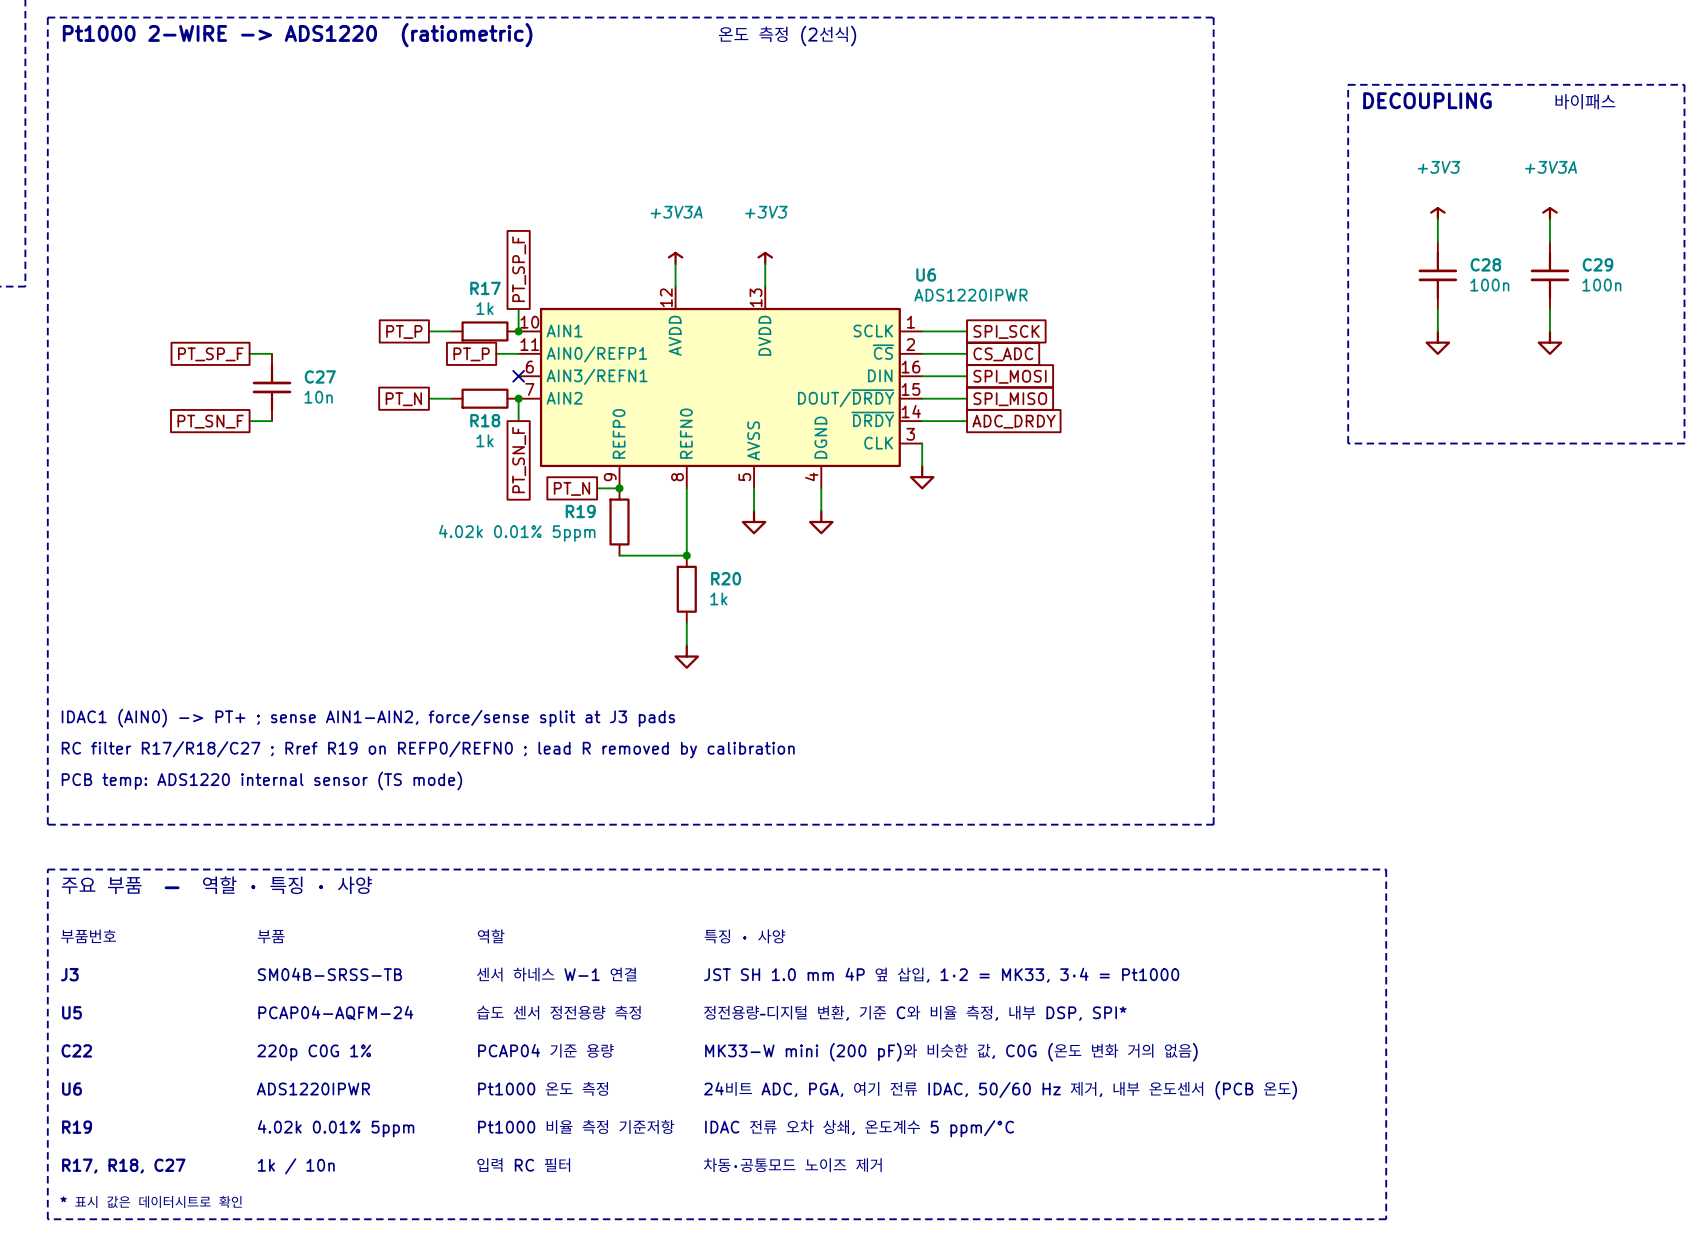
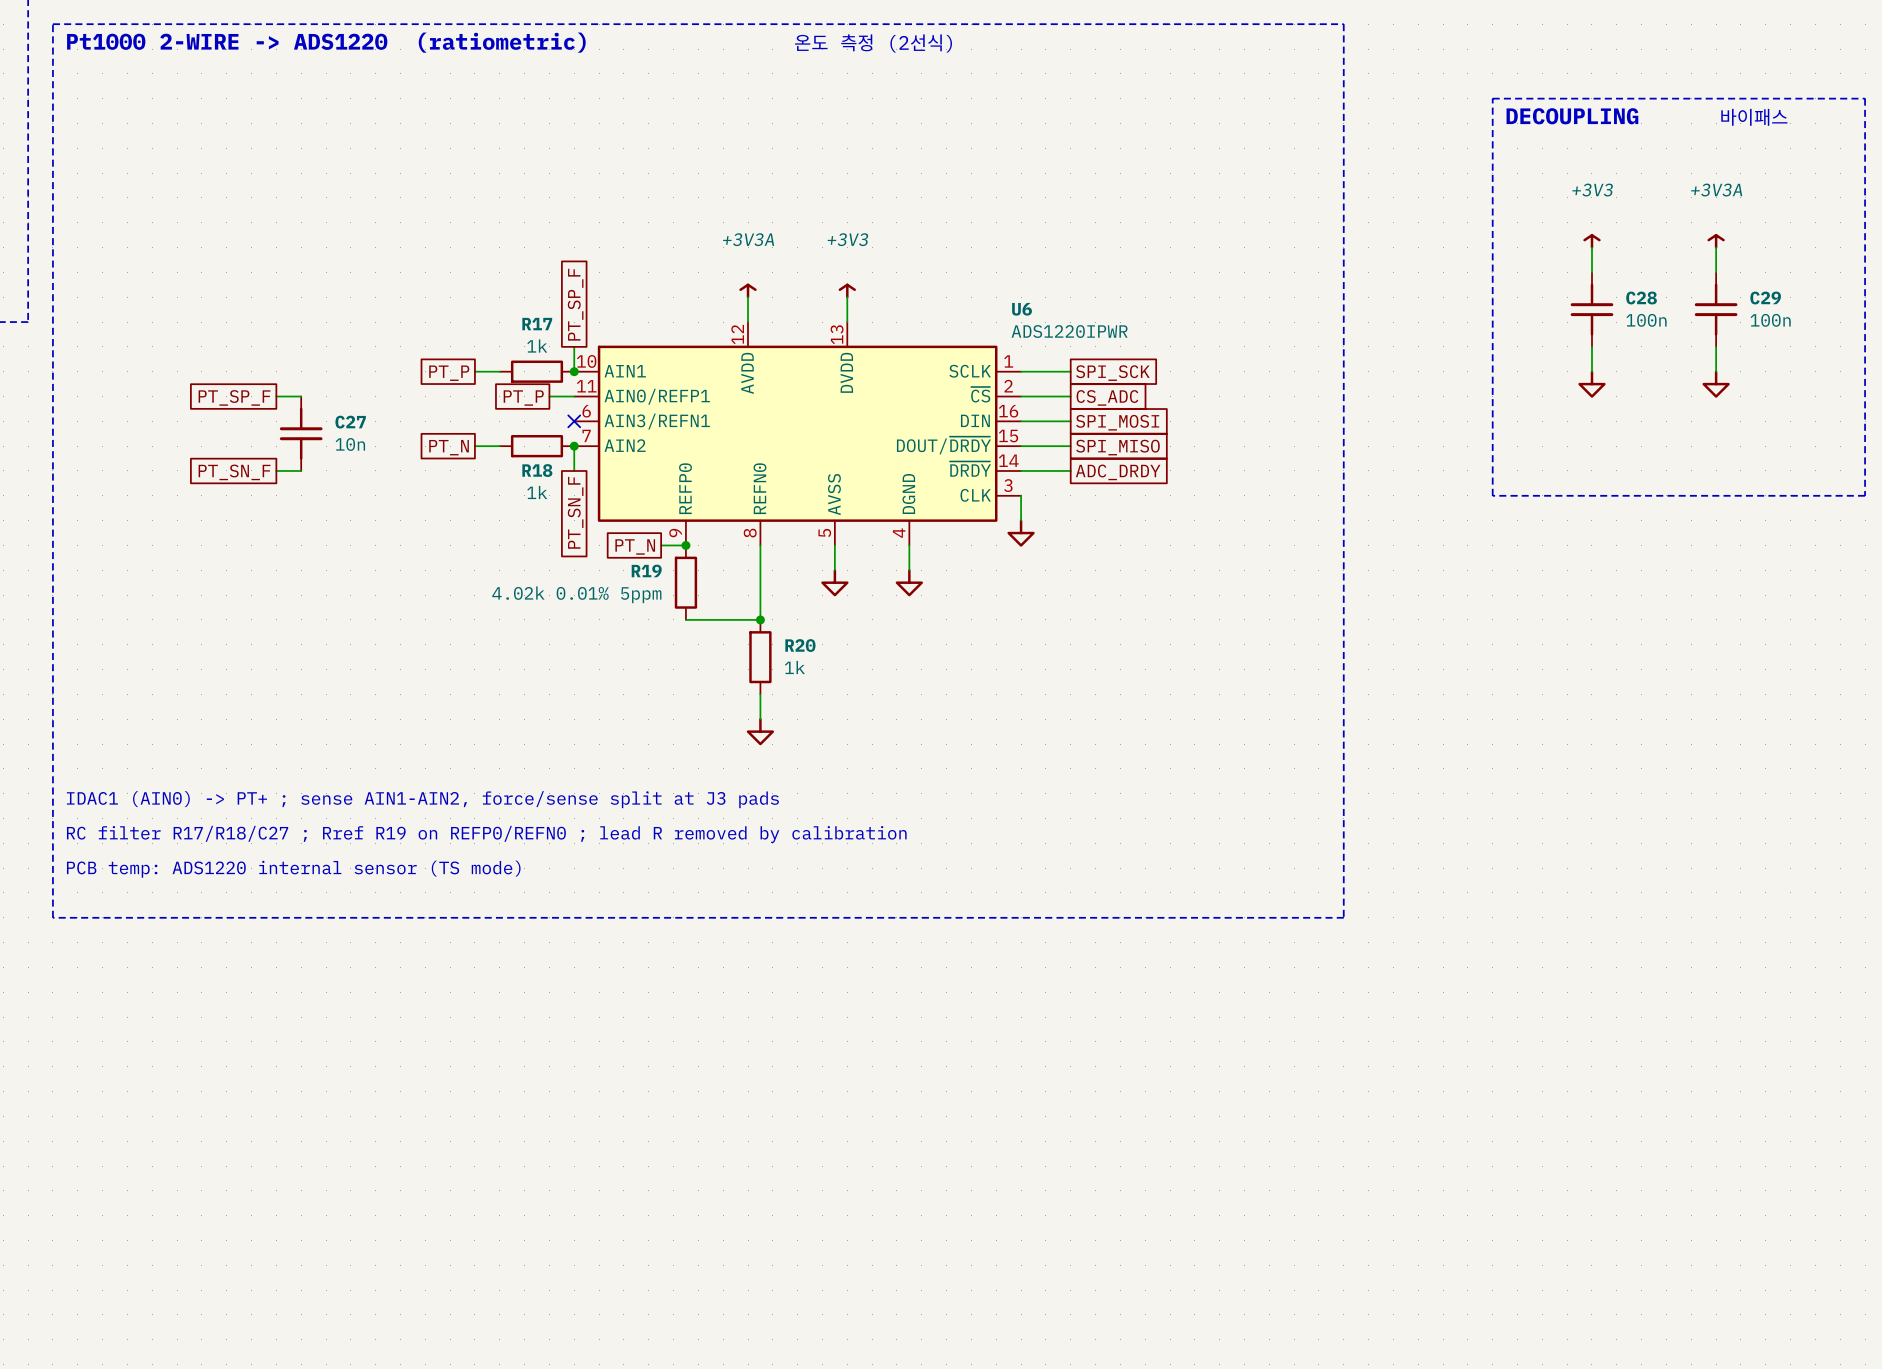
line: (47, 869) (1386, 869) (1386, 1219) (47, 1219) (47, 869) -> none
text: 주요 부품 — 역할 · 특징 · 사양 (216, 885) -> none
text: 부품번호 (88, 936) -> none
text: 부품 (271, 936) -> none
text: 역할 (491, 936) -> none
text: 특징 · 사양 (744, 936) -> none
text: J3 (69, 974) -> none
text: SM04B-SRSS-TB (329, 974) -> none
text: 센서 하네스 W-1 연결 (556, 974) -> none
text: JST SH 1.0 mm 4P 옆 삽입, 1·2 = MK33, 3·4 = Pt1000 (941, 974) -> none
text: U5 (71, 1012) -> none
text: 습도 센서 정전용량 측정 (558, 1012) -> none
text: 정전용량–디지털 변환, 기준 C와 비율 측정, 내부 DSP, SPI* (914, 1012) -> none
text: PCAP04-AQFM-24 (335, 1013) -> none
text: C22 (76, 1050) -> none
text: PCAP04 기준 용량 (546, 1050) -> none
text: 220p C0G 1% (314, 1052) -> none
text: MK33-W mini (200 pF)와 비슷한 값, C0G (온도 변화 거의 없음) (951, 1052) -> none
text: Pt1000 온도 측정 (543, 1088) -> none
text: U6 (71, 1089) -> none
text: ADS1220IPWR (313, 1089) -> none
text: 24비트 ADC, PGA, 여기 전류 IDAC, 50/60 Hz 제거, 내부 온도센서 (PCB 온도) (1000, 1090) -> none
text: Pt1000 비율 측정 기준저항 (576, 1126) -> none
text: R19 (77, 1127) -> none
text: 4.02k 0.01% 5ppm (336, 1128) -> none
text: IDAC 전류 오차 상쇄, 온도계수 5 ppm/°C (859, 1128) -> none
text: 입력 RC 필터 (523, 1165) -> none
text: 차동·공통모드 노이즈 제거 (792, 1165) -> none
text: R17, R18, C27 (123, 1166) -> none
text: 1k / 10n (296, 1166) -> none
text: * 표시 값은 데이터시트로 확인 (151, 1201) -> none

